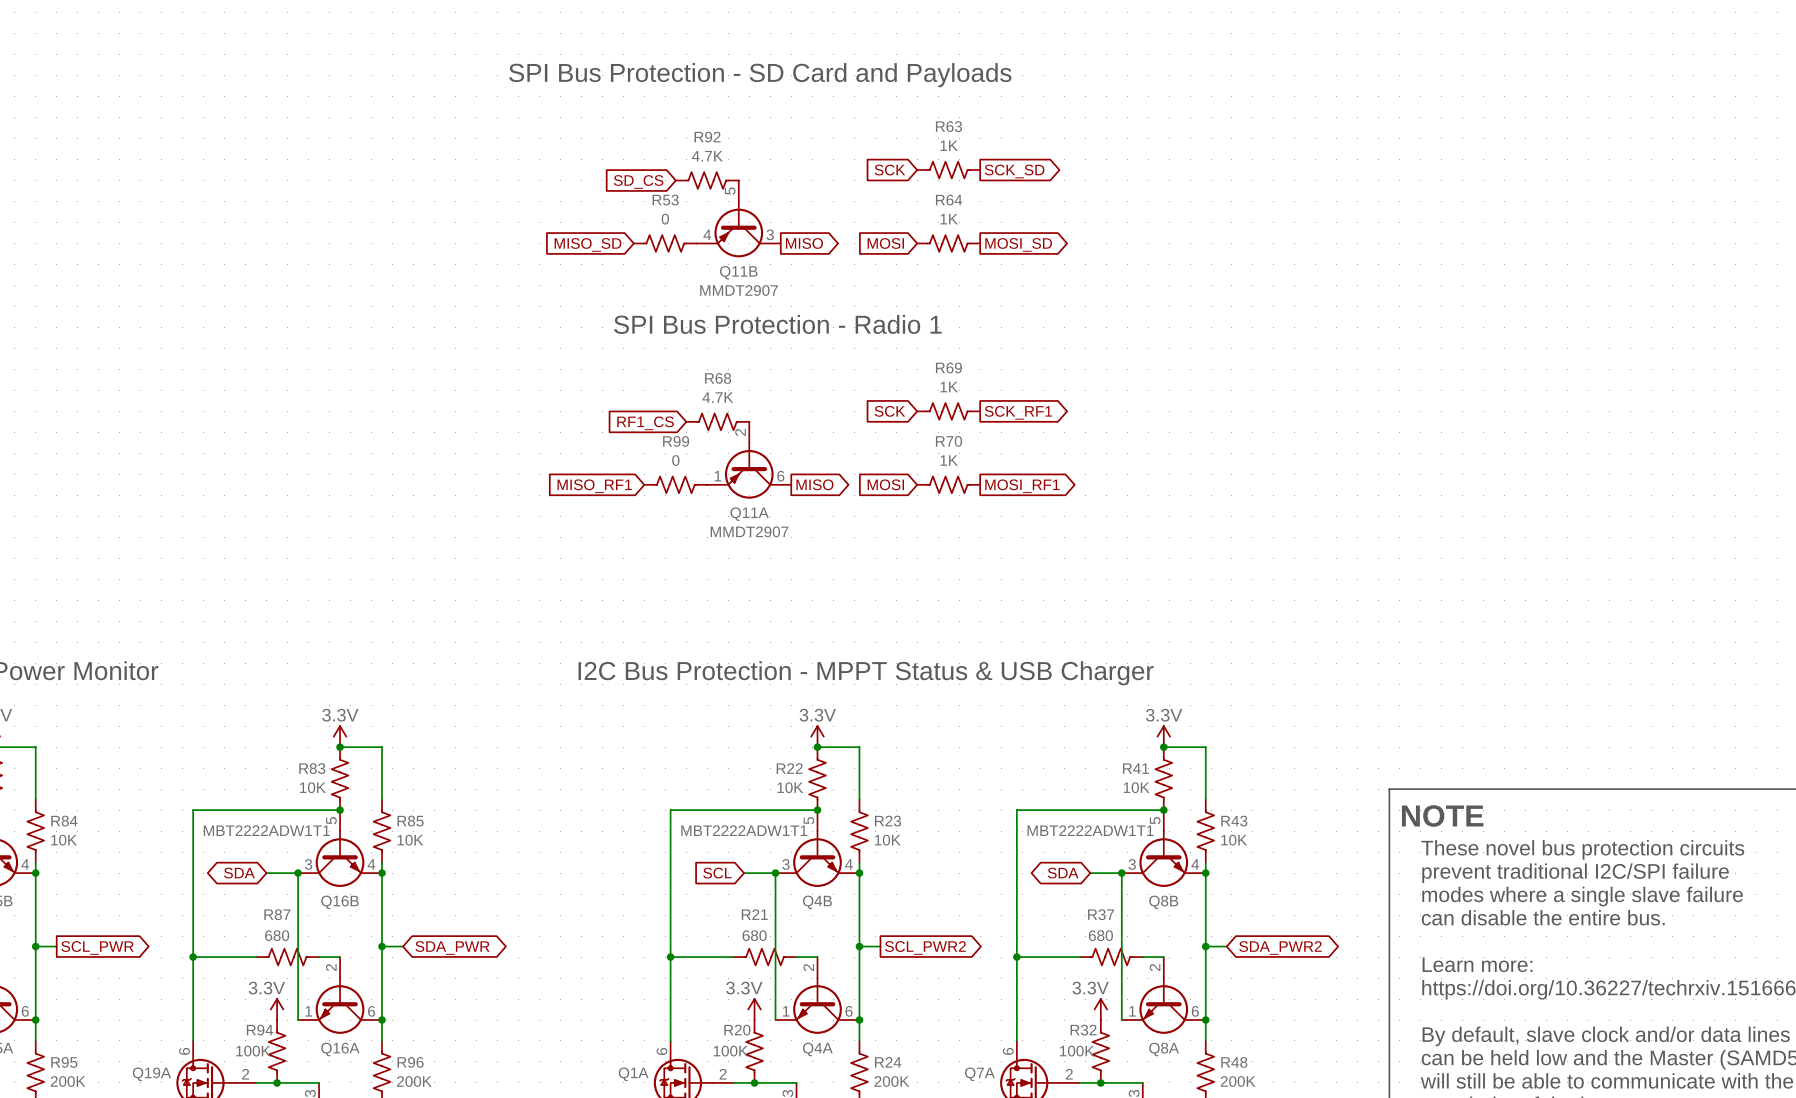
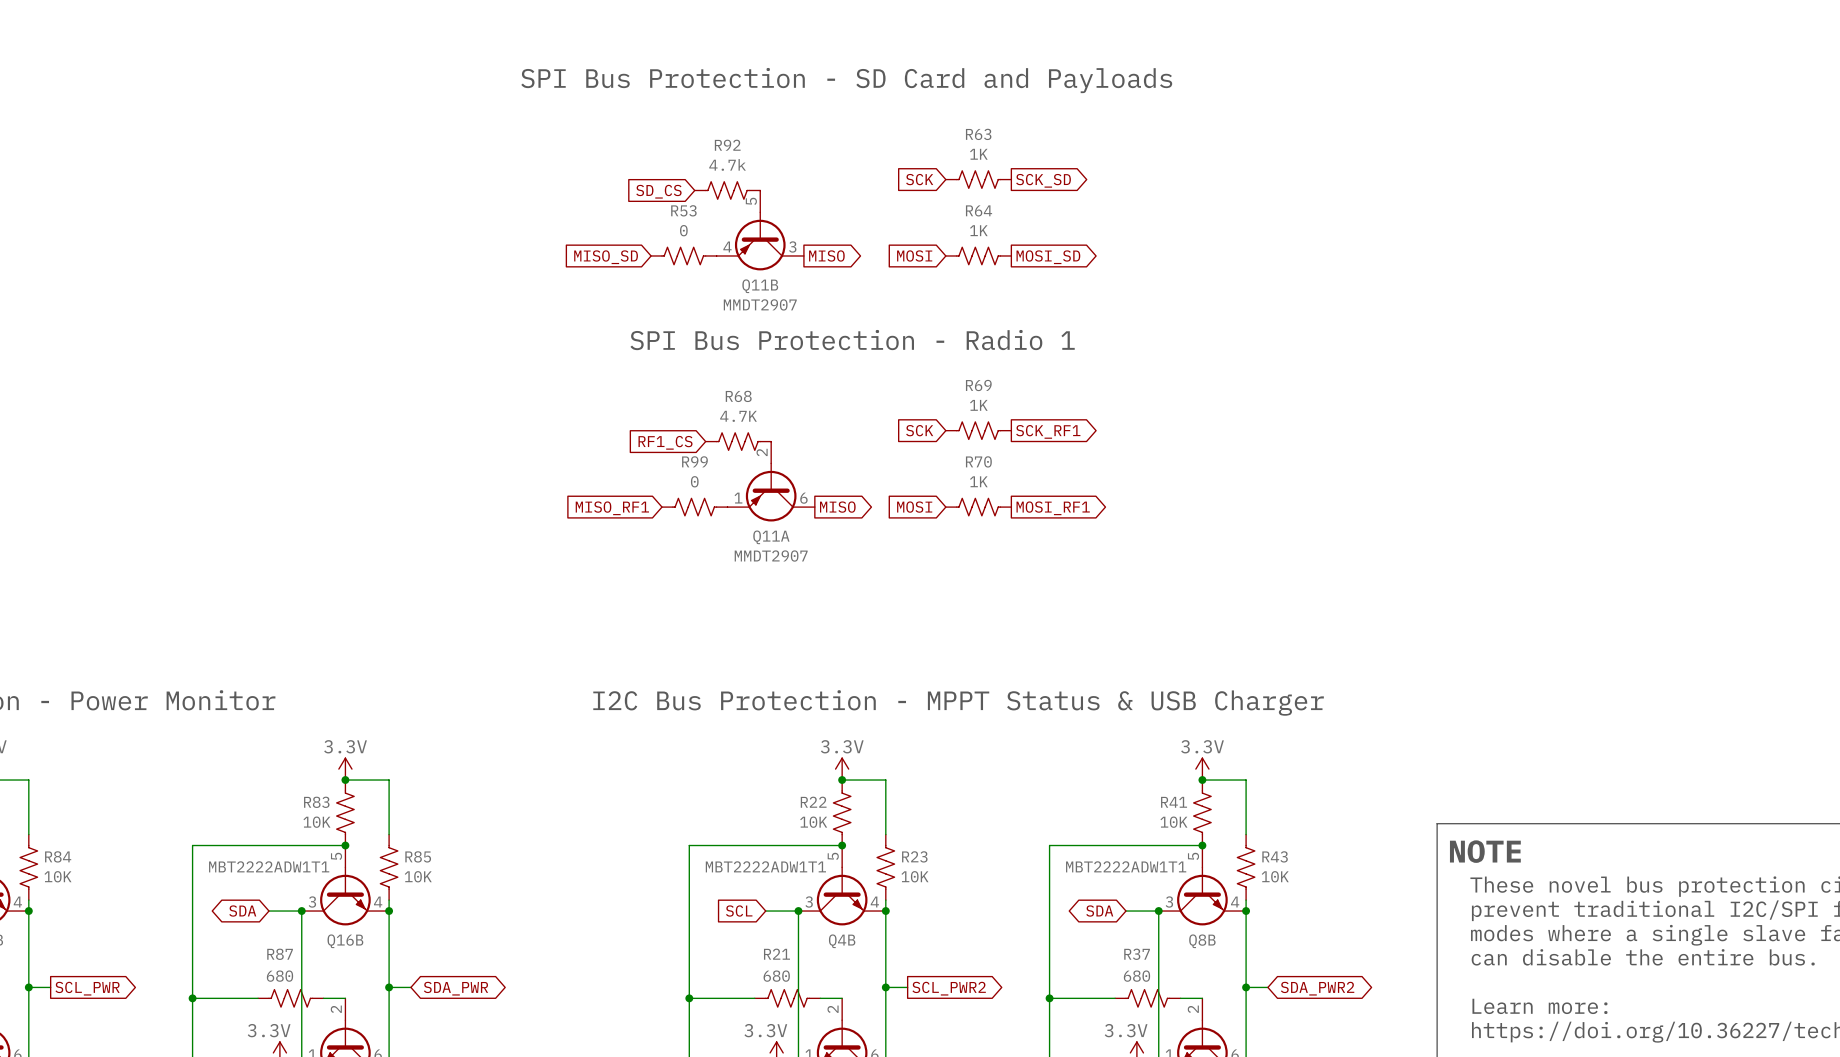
R92 value: 4.7K (707, 156) -> 4.7k (727, 164)

